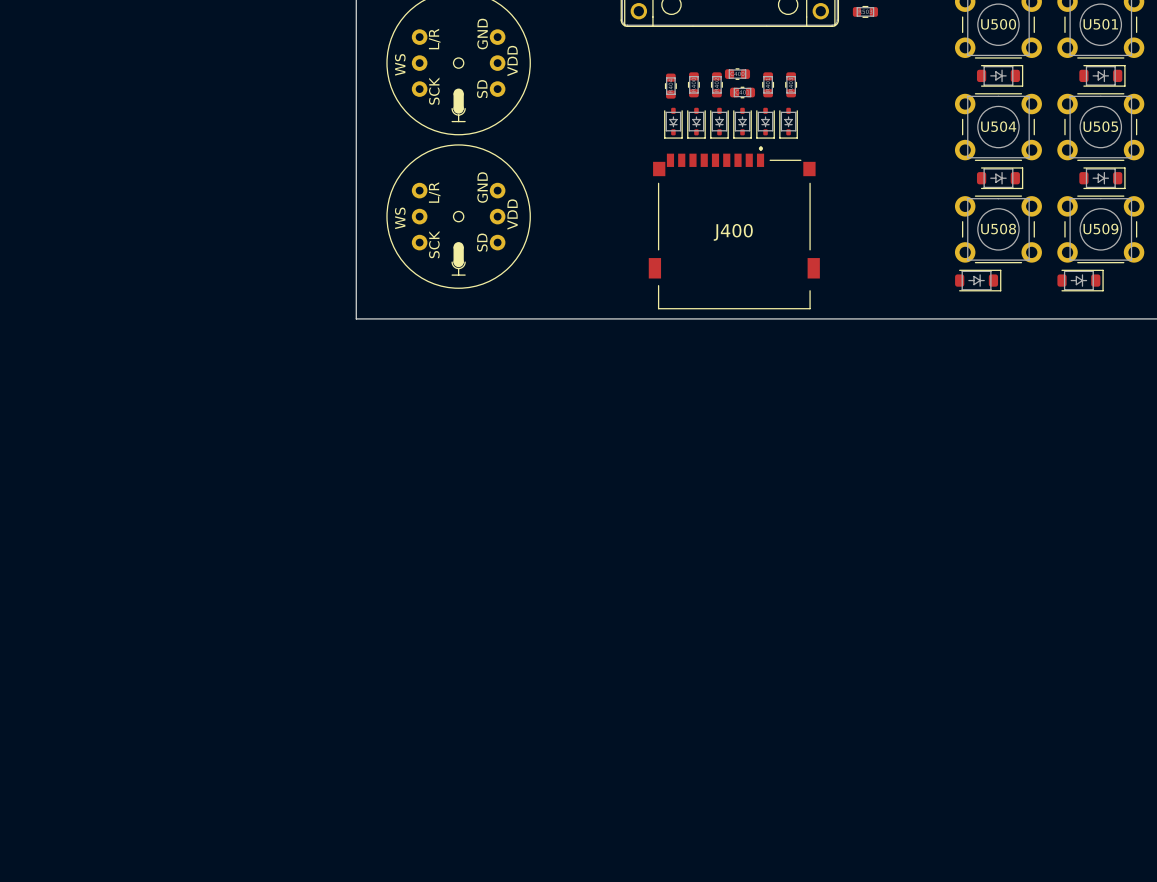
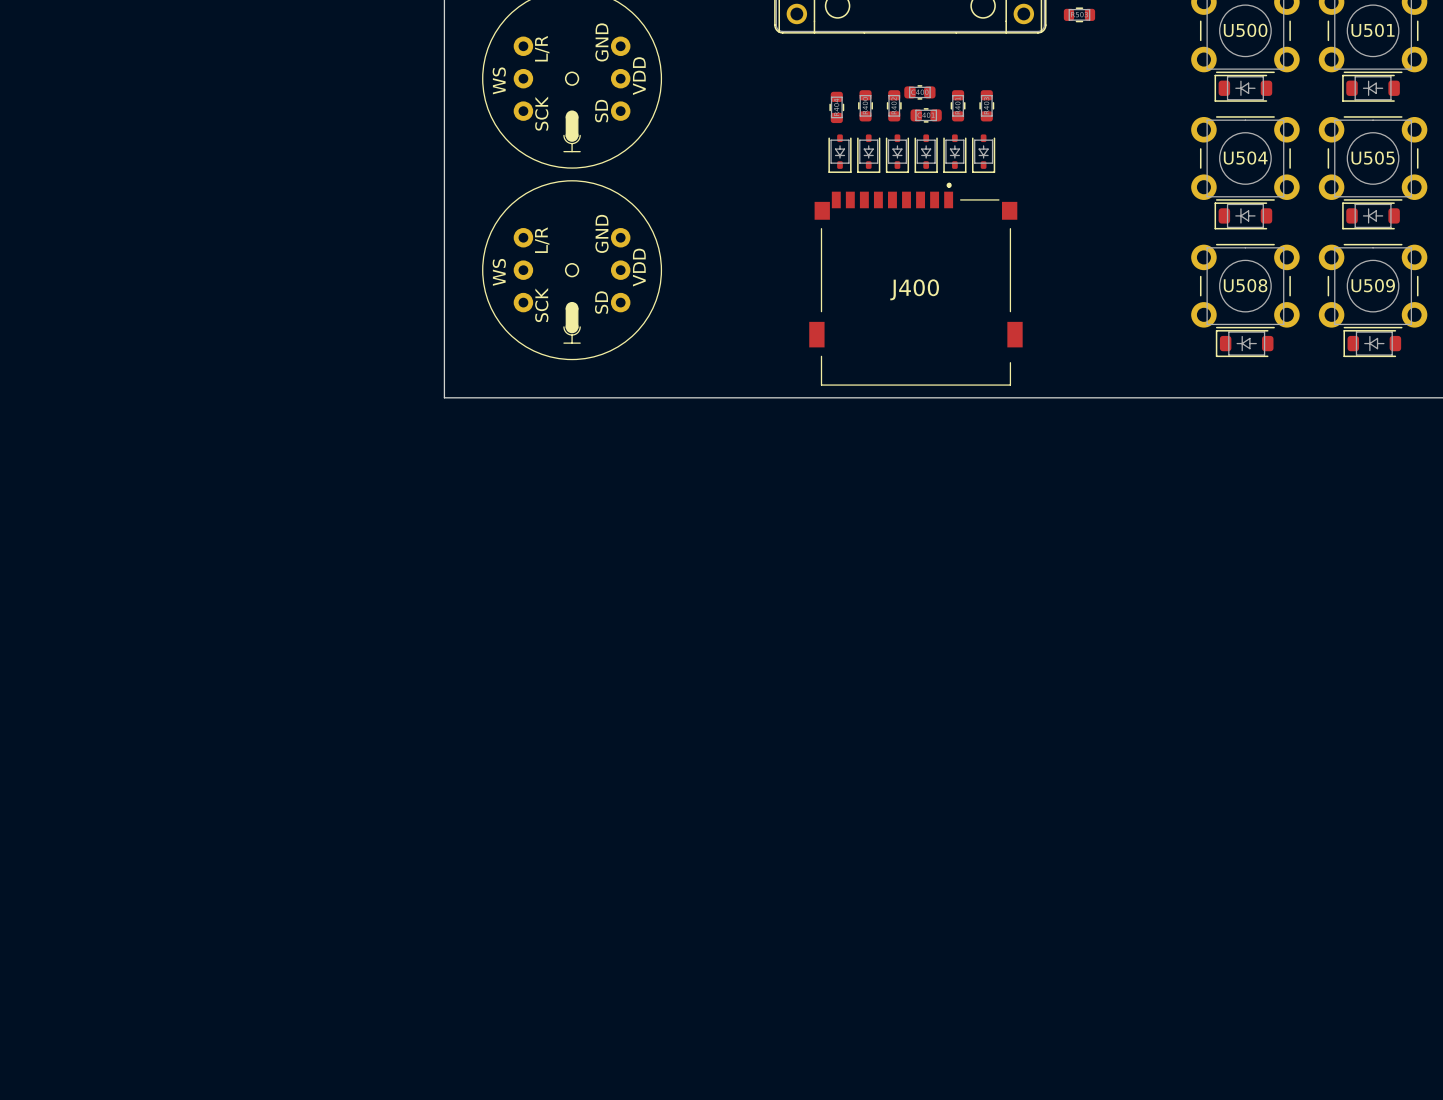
part rotation: 0° (1000, 75) -> 180° (1243, 88)
part rotation: 0° (1102, 75) -> 180° (1371, 88)
part rotation: 0° (1000, 178) -> 180° (1243, 215)
part rotation: 0° (1102, 178) -> 180° (1371, 215)
part rotation: 0° (978, 280) -> 180° (1244, 343)
part rotation: 0° (1080, 280) -> 180° (1372, 343)

